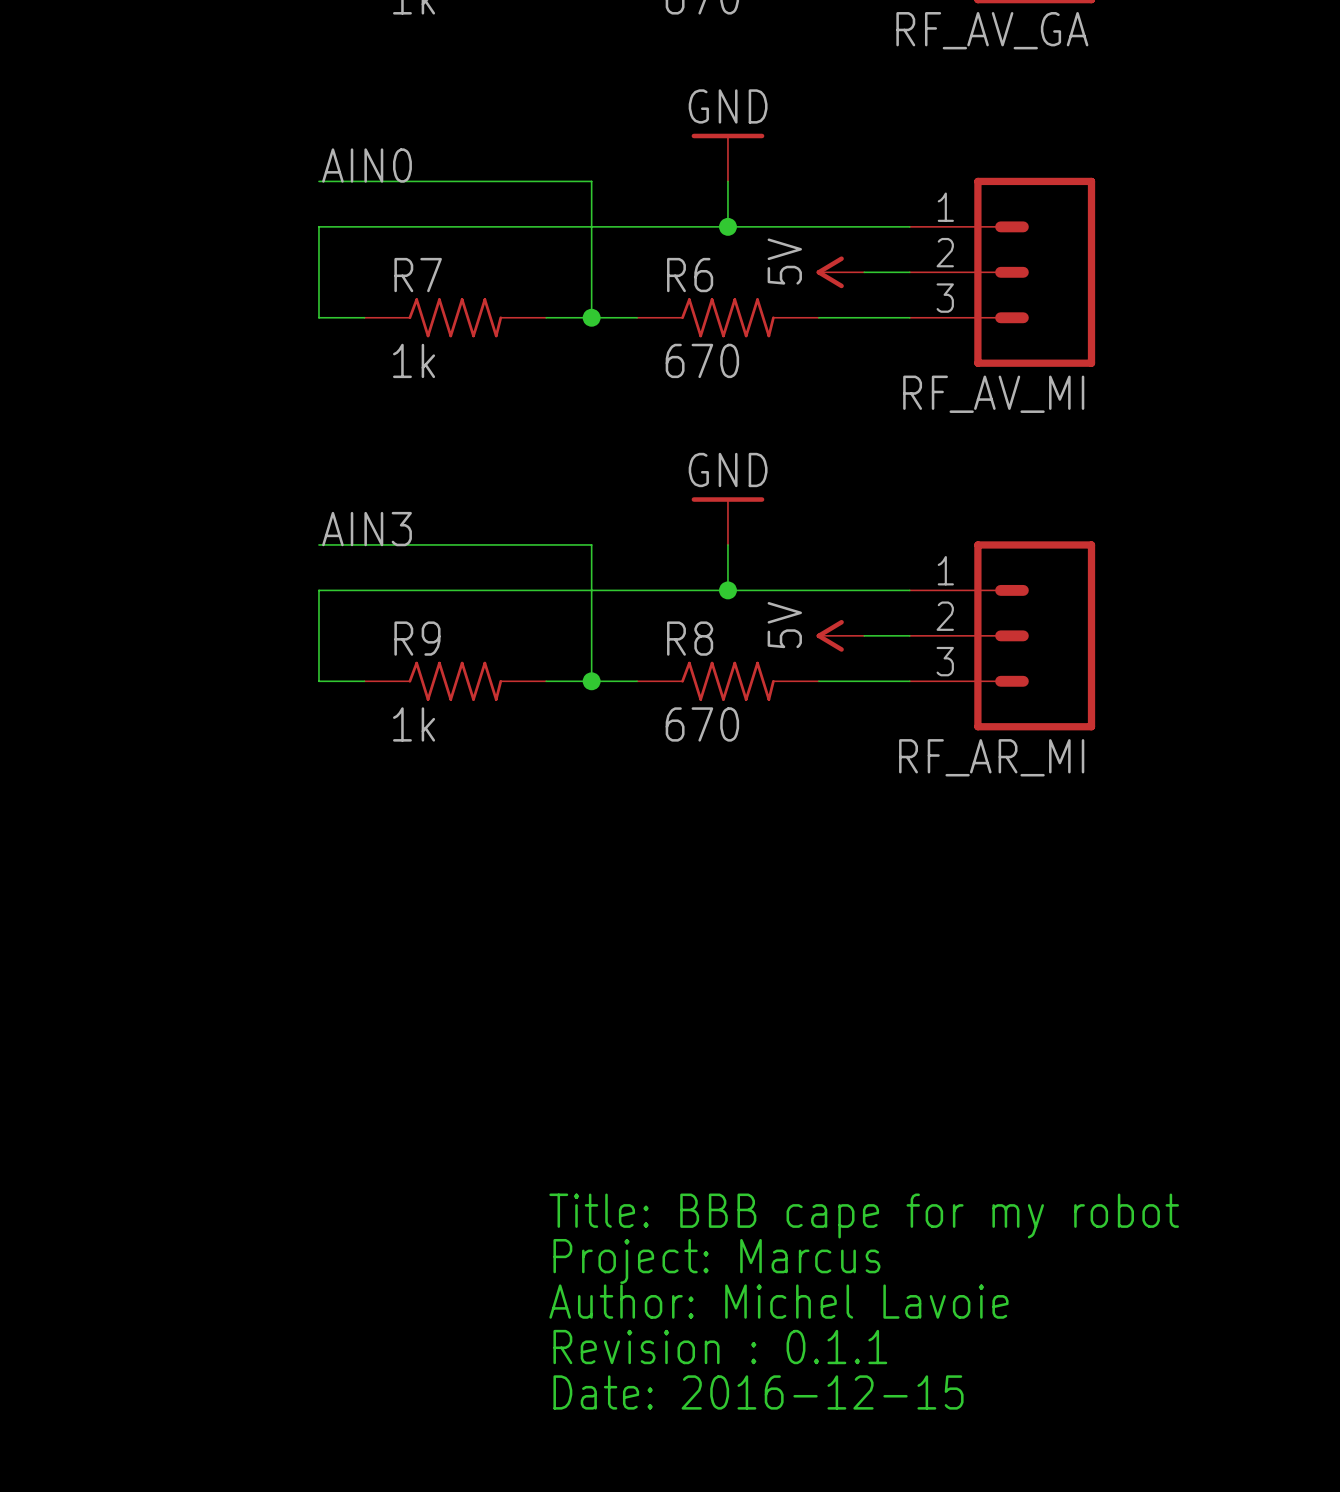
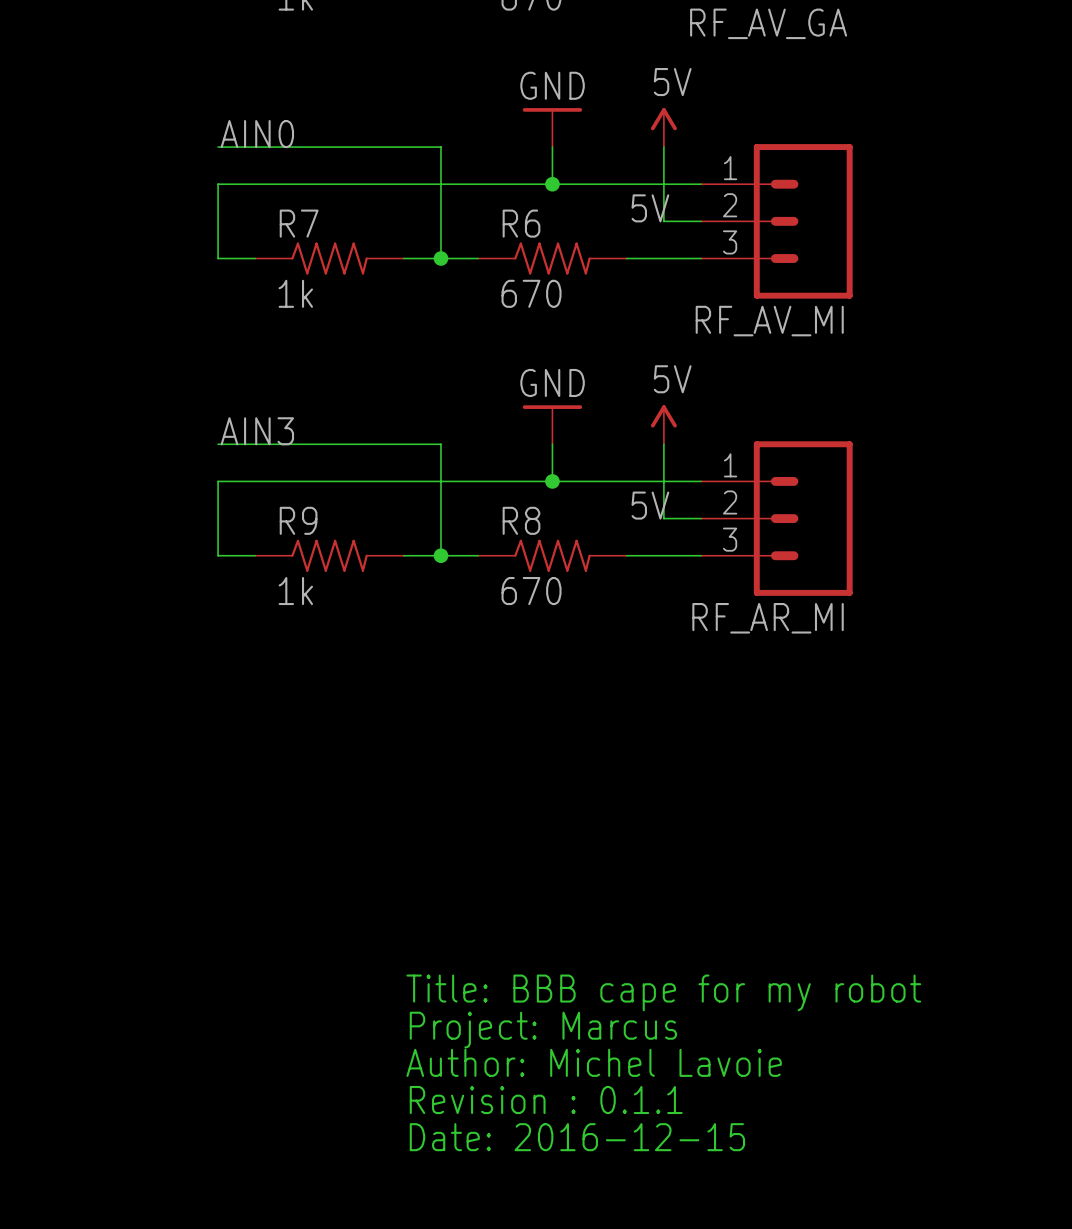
wire: none -> (663, 147) (663, 221)
label: none -> 5V (650, 208)
power symbol rotation: 0° (830, 272) -> 90° clockwise (663, 119)
power symbol position: 5V (840, 272) -> 5V (663, 127)
wire: none -> (663, 444) (663, 518)
label: none -> 5V (650, 505)
power symbol rotation: 0° (830, 635) -> 90° clockwise (663, 416)
power symbol position: 5V (840, 635) -> 5V (663, 424)

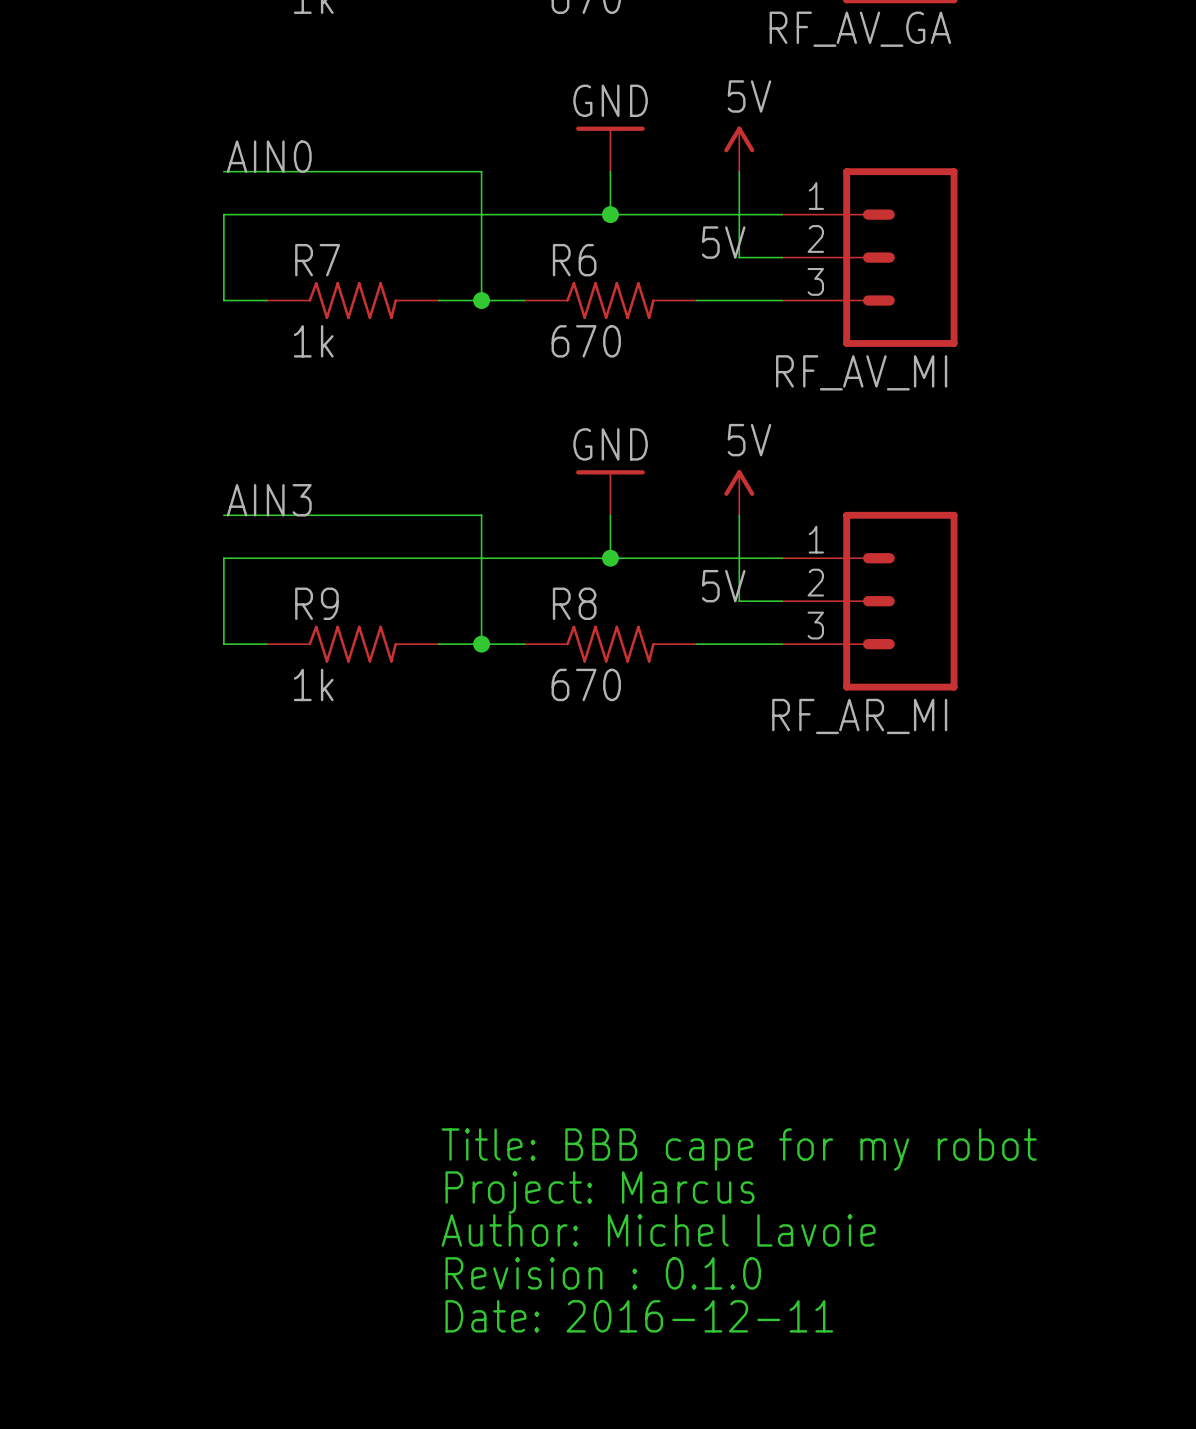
text: Revision : 0.1.1 (546, 1100) -> Revision : 0.1.0 (603, 1273)
text: Date: 2016-12-15 (577, 1137) -> Date: 2016-12-11 (639, 1316)

